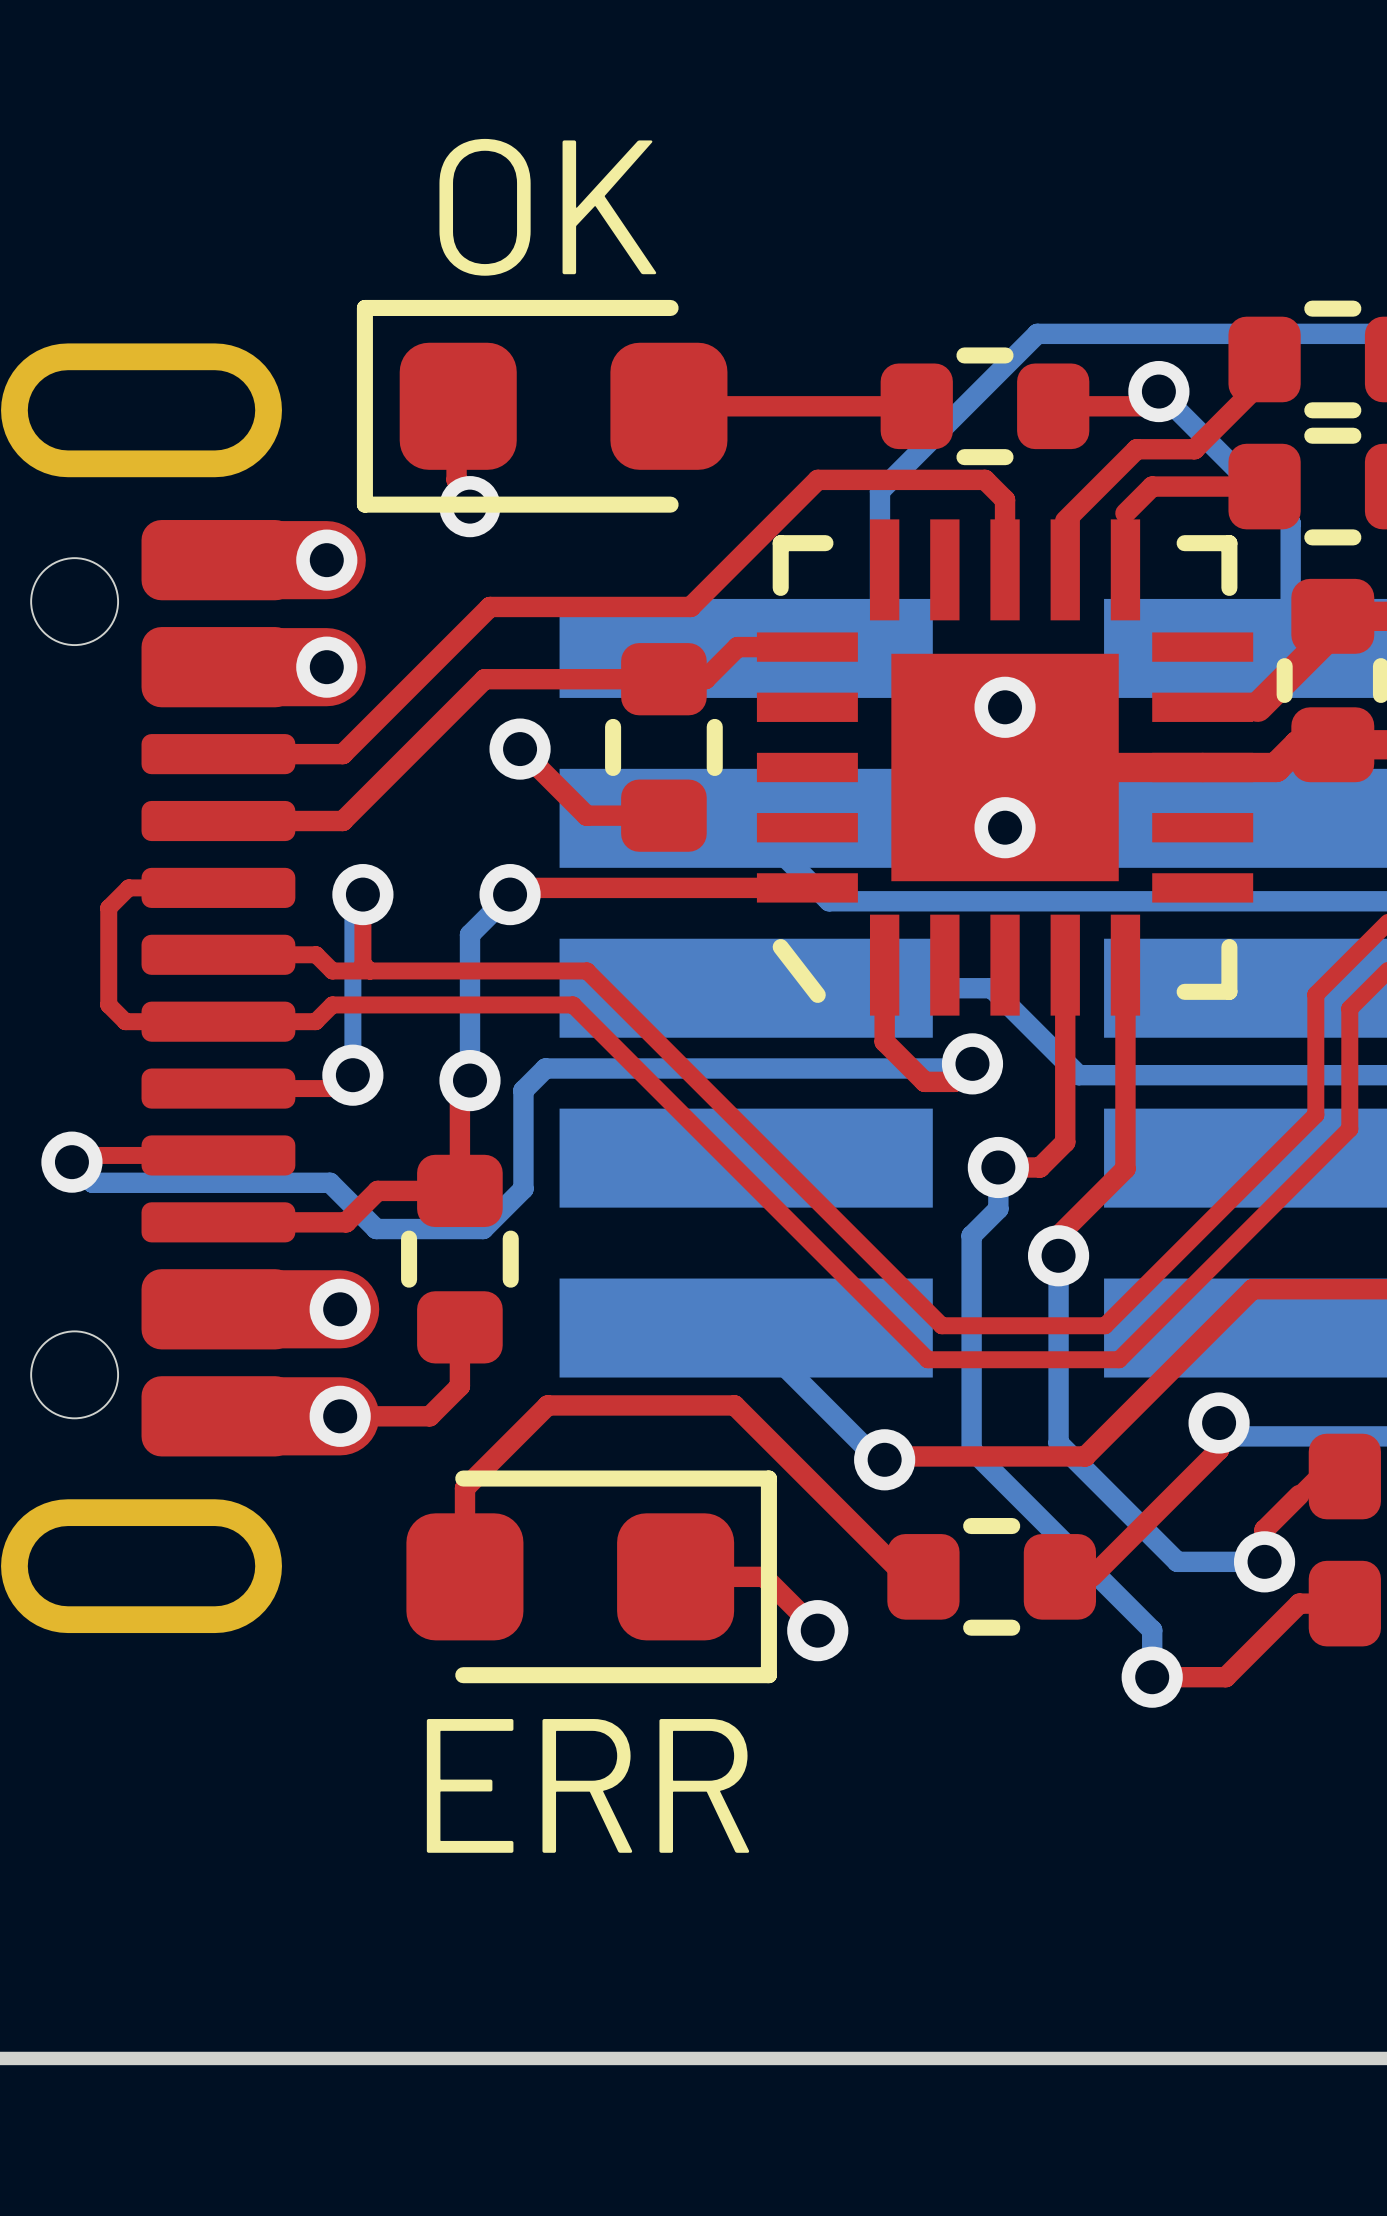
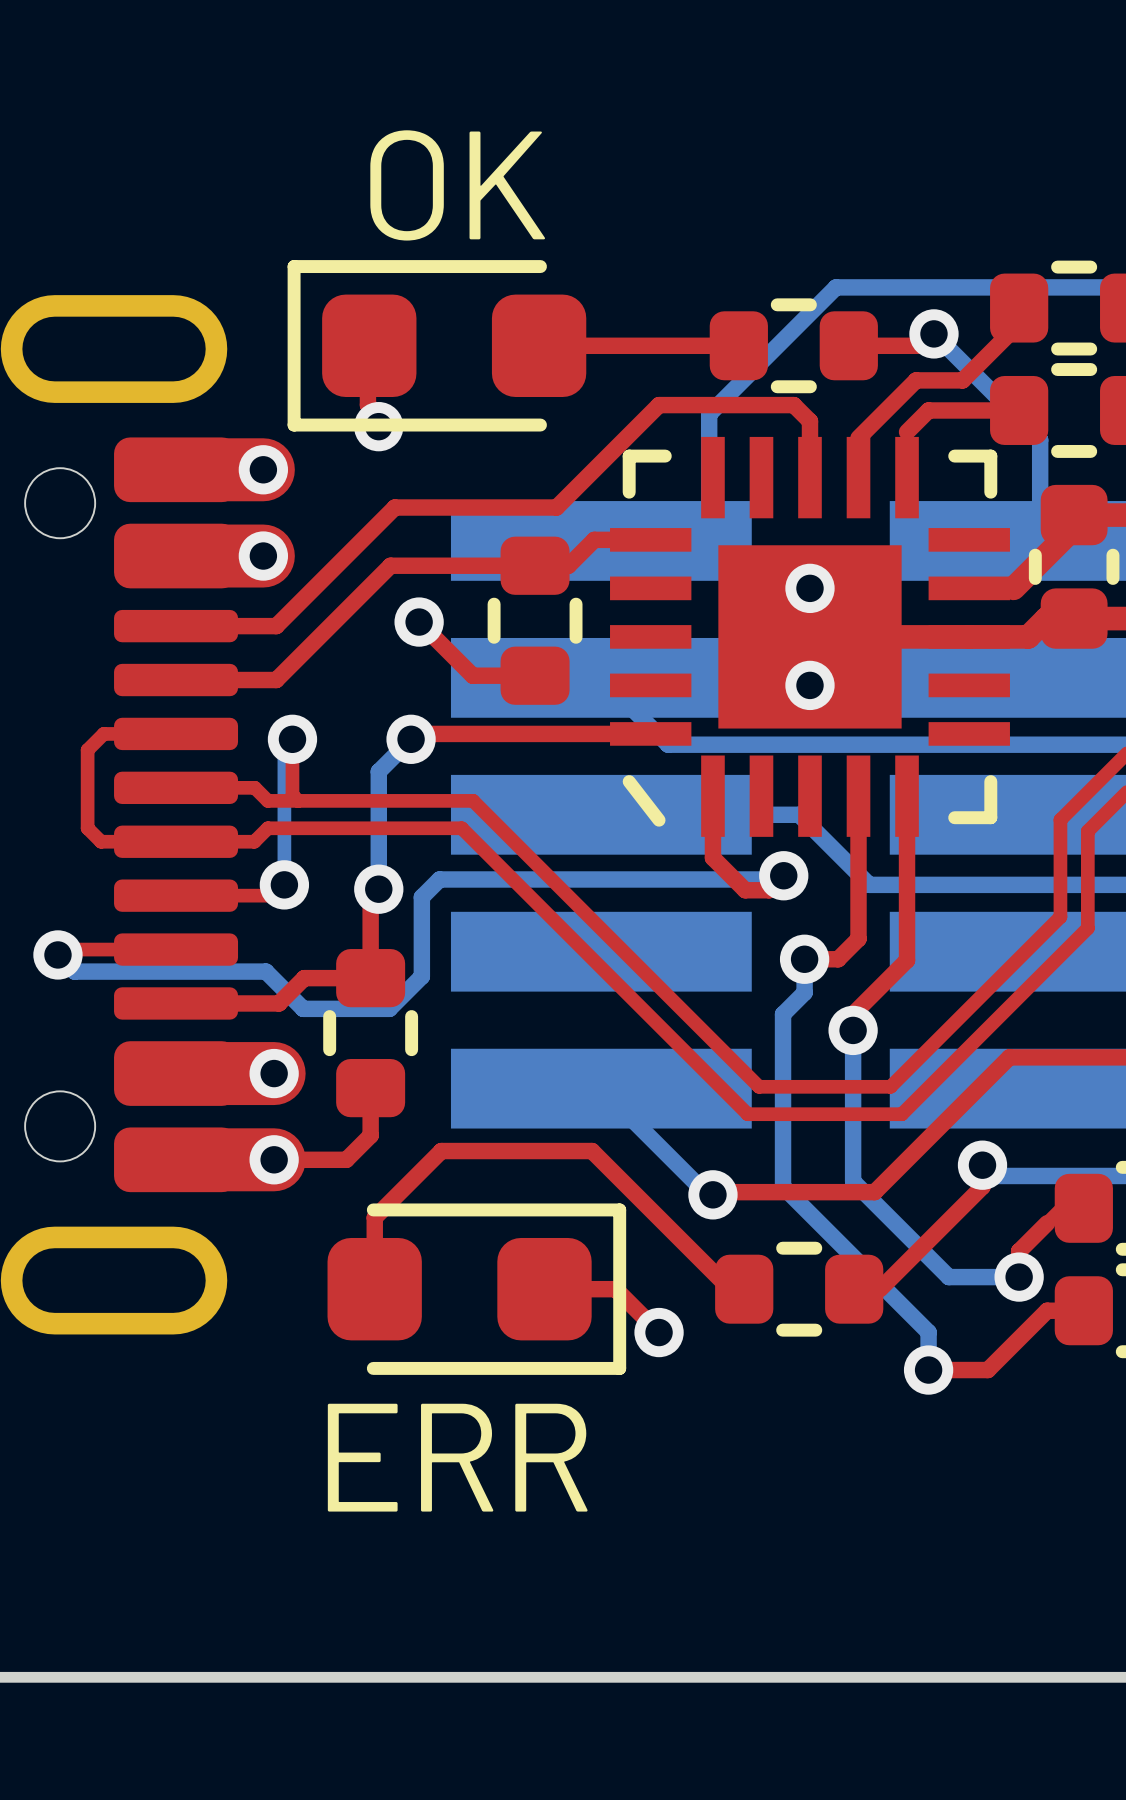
text position: OK (547, 207) -> OK (457, 185)
text position: ERR (587, 1785) -> ERR (457, 1457)

